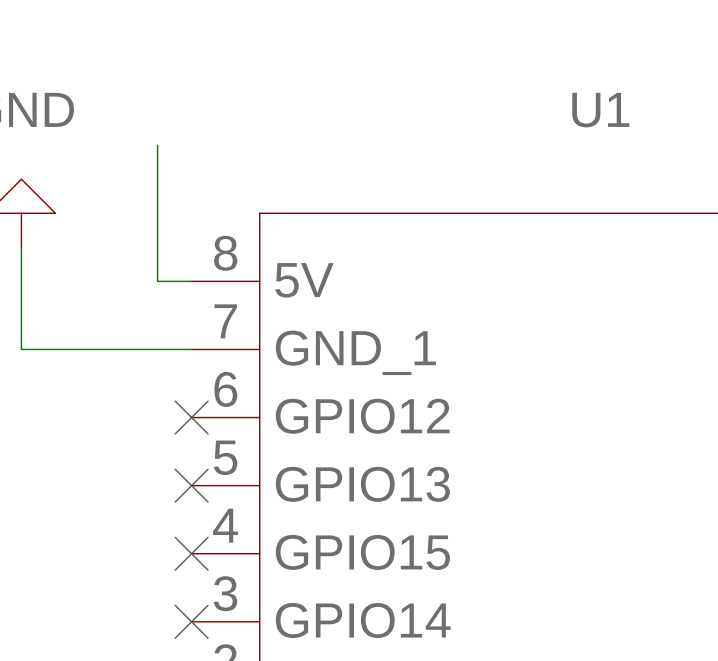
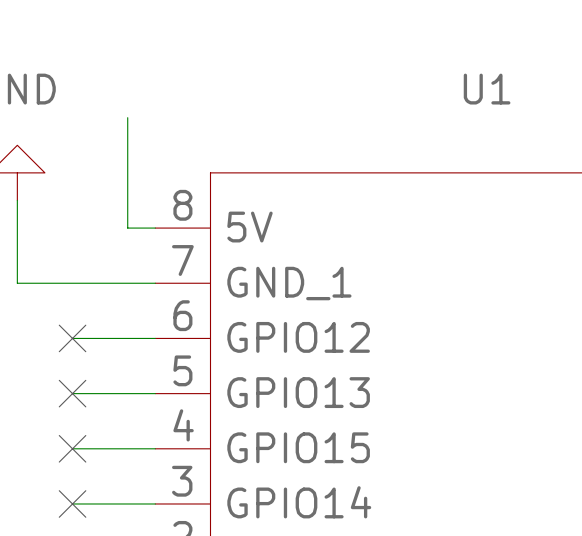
wire: none -> (72, 338) (155, 338)
no-connect mark: none -> (72, 338)
no-connect mark: (191, 417) -> none
wire: none -> (72, 393) (155, 393)
no-connect mark: none -> (72, 393)
no-connect mark: (191, 485) -> none
wire: none -> (72, 448) (155, 448)
no-connect mark: none -> (72, 448)
no-connect mark: (191, 553) -> none
wire: none -> (72, 503) (155, 503)
no-connect mark: none -> (72, 503)
no-connect mark: (191, 621) -> none

